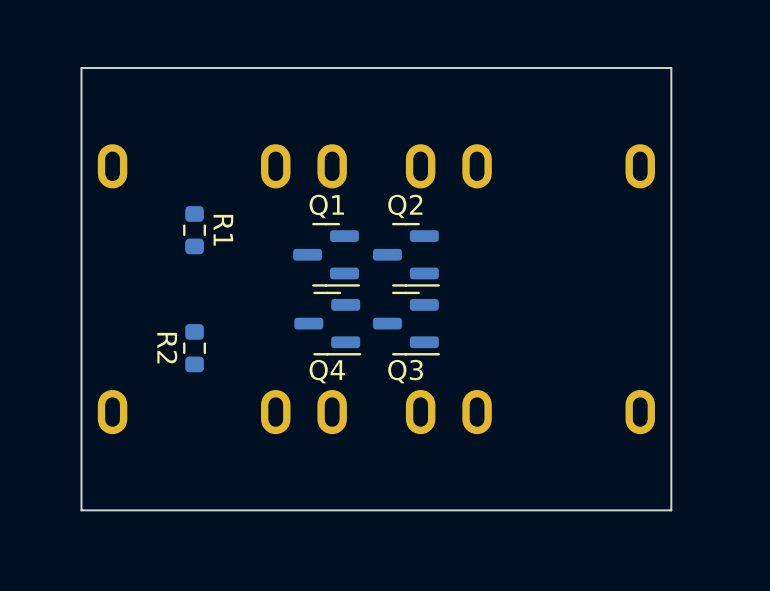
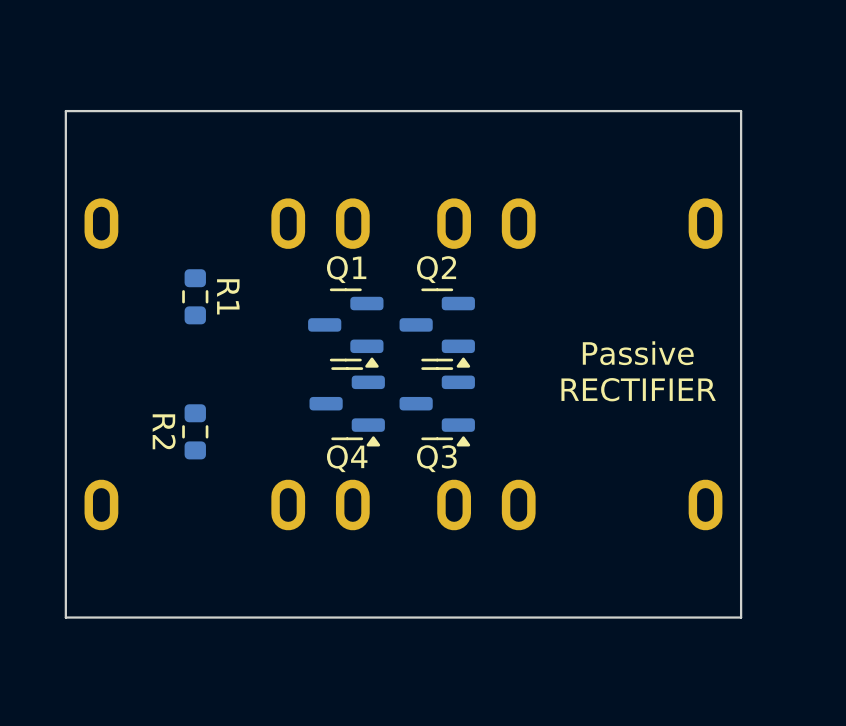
Q1 footprint: [293, 222, 361, 287] -> [308, 288, 384, 368]
Q2 footprint: [372, 222, 441, 287] -> [399, 288, 475, 368]
text: none -> Passive (638, 353)
Q4 footprint: [294, 291, 362, 356] -> [309, 367, 385, 447]
Q3 footprint: [372, 291, 441, 356] -> [399, 367, 475, 447]
text: none -> RECTIFIER (638, 389)

